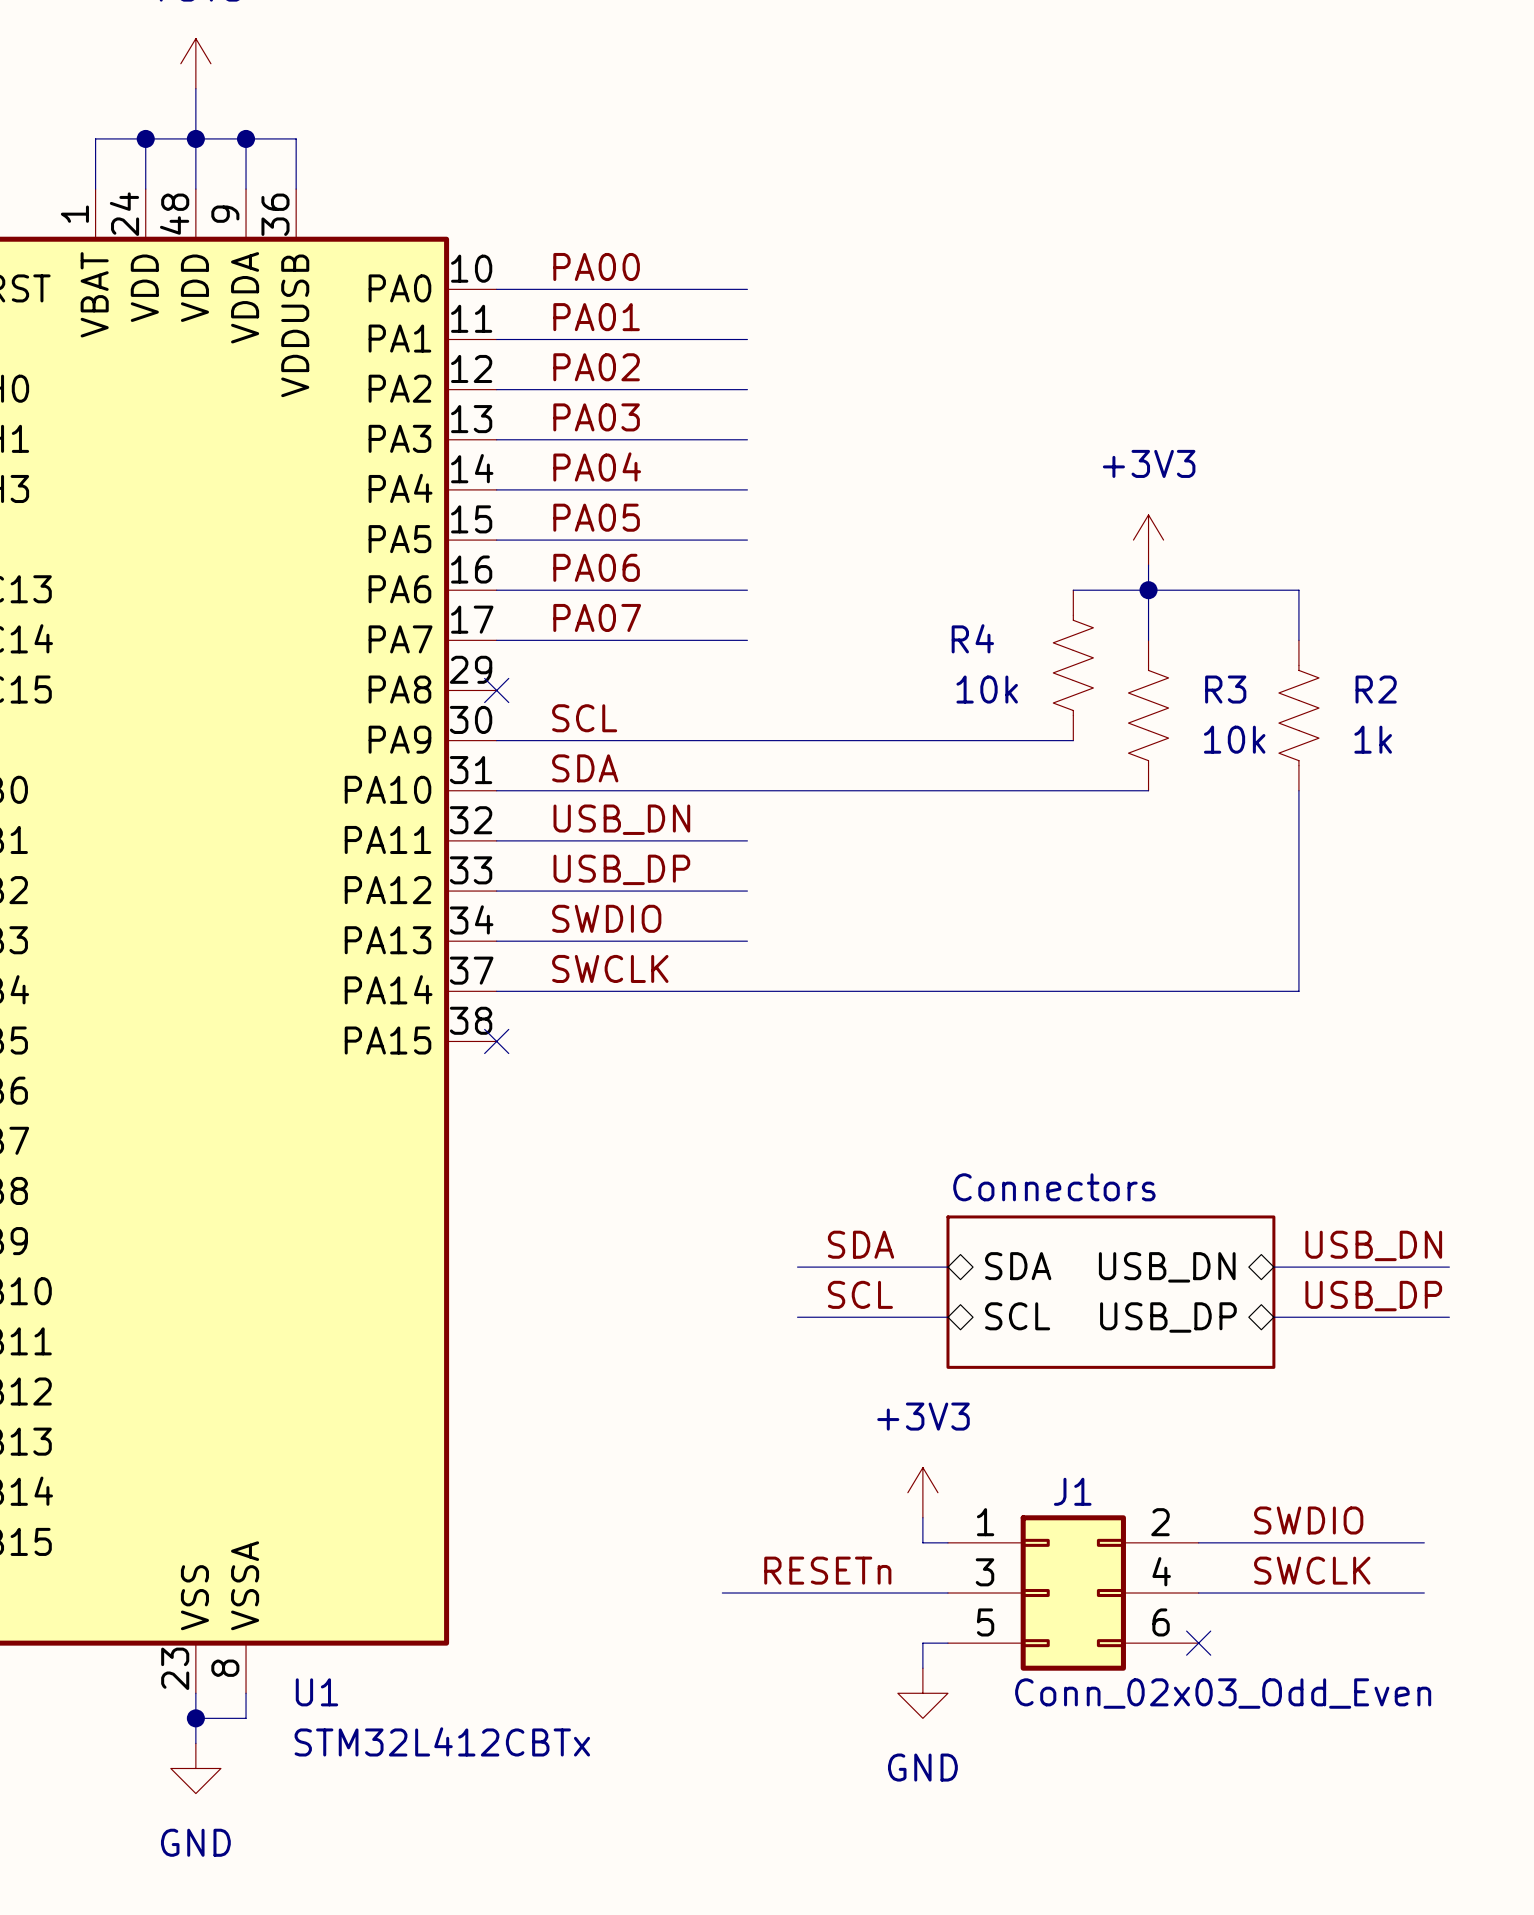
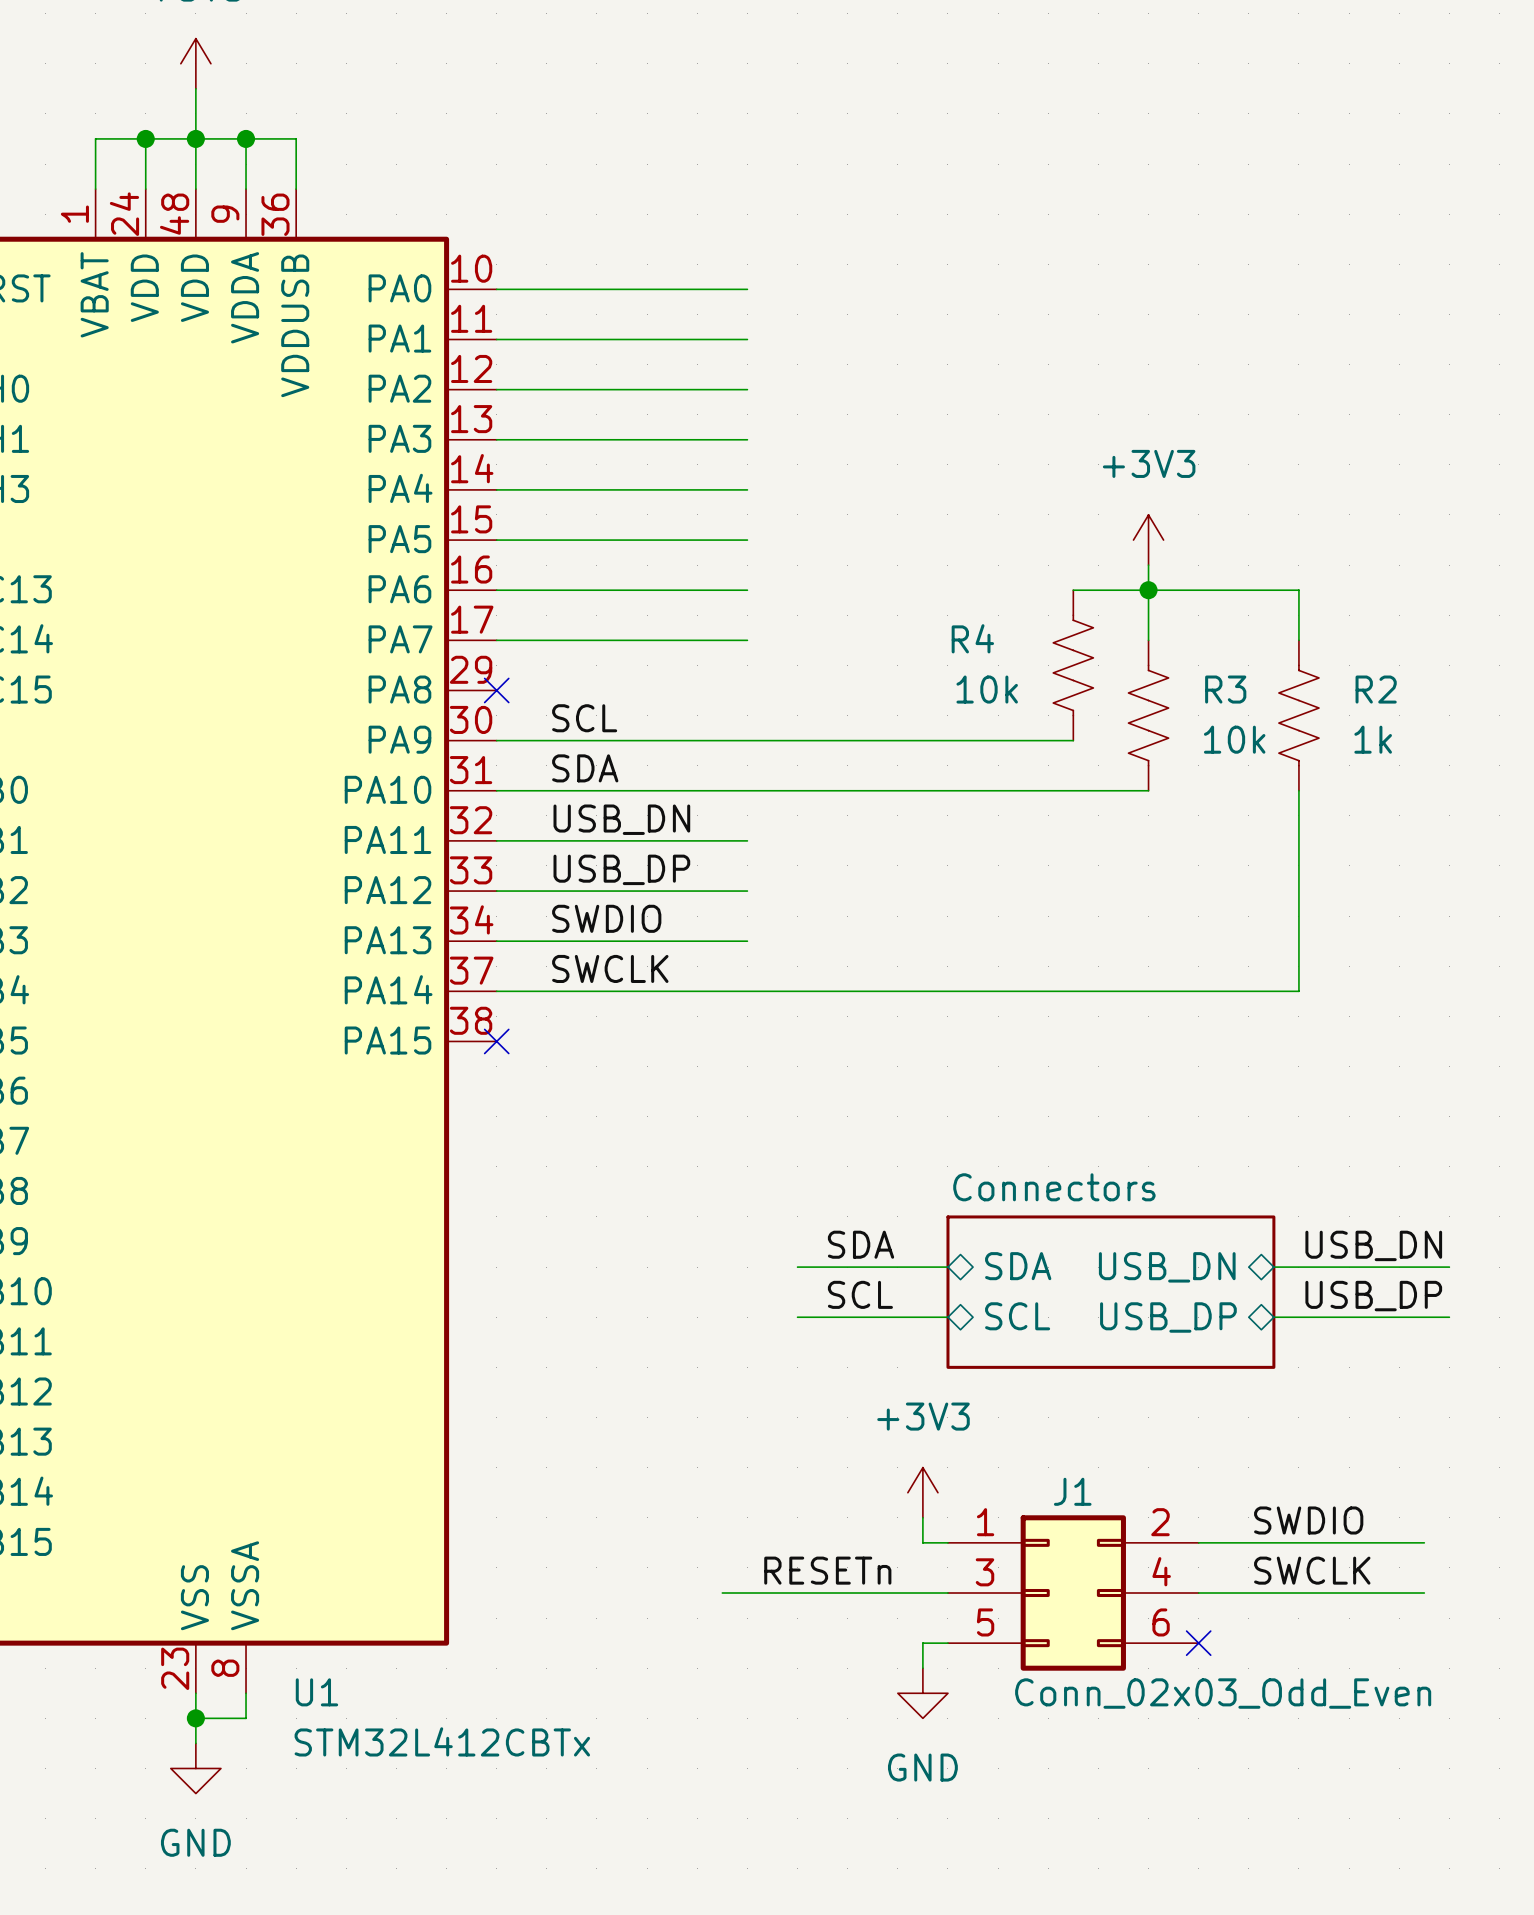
label: PA00 (596, 266) -> none
label: PA01 (596, 317) -> none
label: PA02 (596, 367) -> none
label: PA03 (596, 417) -> none
label: PA04 (597, 466) -> none
label: PA05 (596, 517) -> none
label: PA06 (596, 567) -> none
label: PA07 (597, 617) -> none

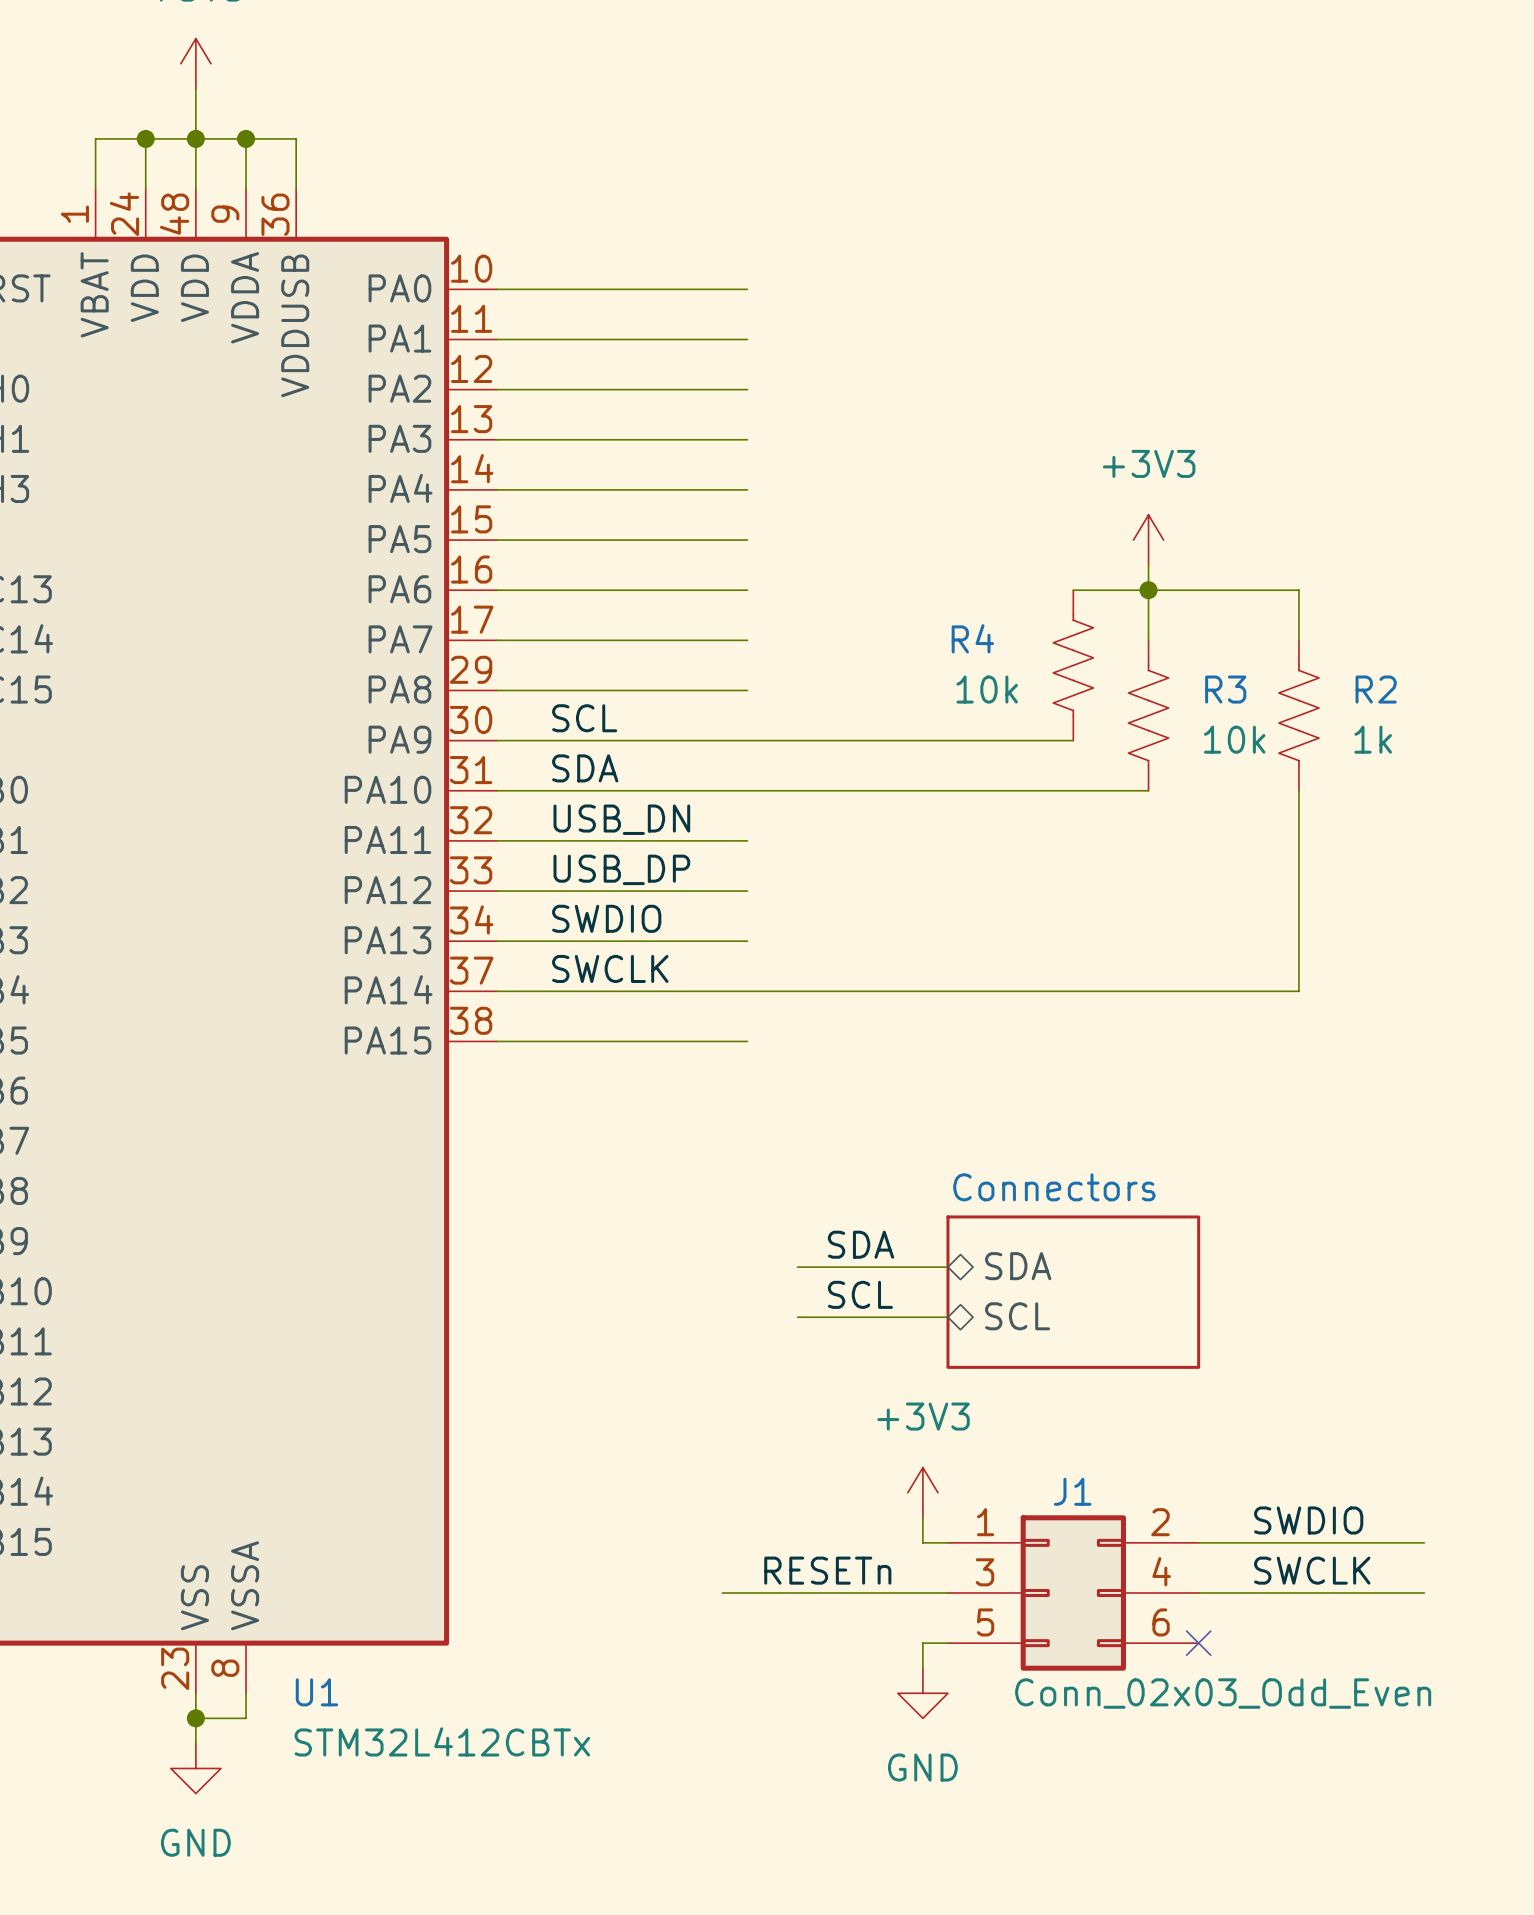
wire: none -> (496, 690) (747, 690)
no-connect mark: (496, 690) -> none
wire: none -> (496, 1041) (747, 1041)
no-connect mark: (496, 1041) -> none
label: USB_DN (1373, 1245) -> none
sheet pin: USB_DN (1167, 1267) -> none
wire: (1273, 1267) (1449, 1267) -> none
sheet Connectors: none -> (1073, 1292)
sheet Connectors: (1110, 1292) -> none
label: USB_DP (1373, 1296) -> none
sheet pin: USB_DP (1168, 1317) -> none
wire: (1273, 1317) (1449, 1317) -> none

